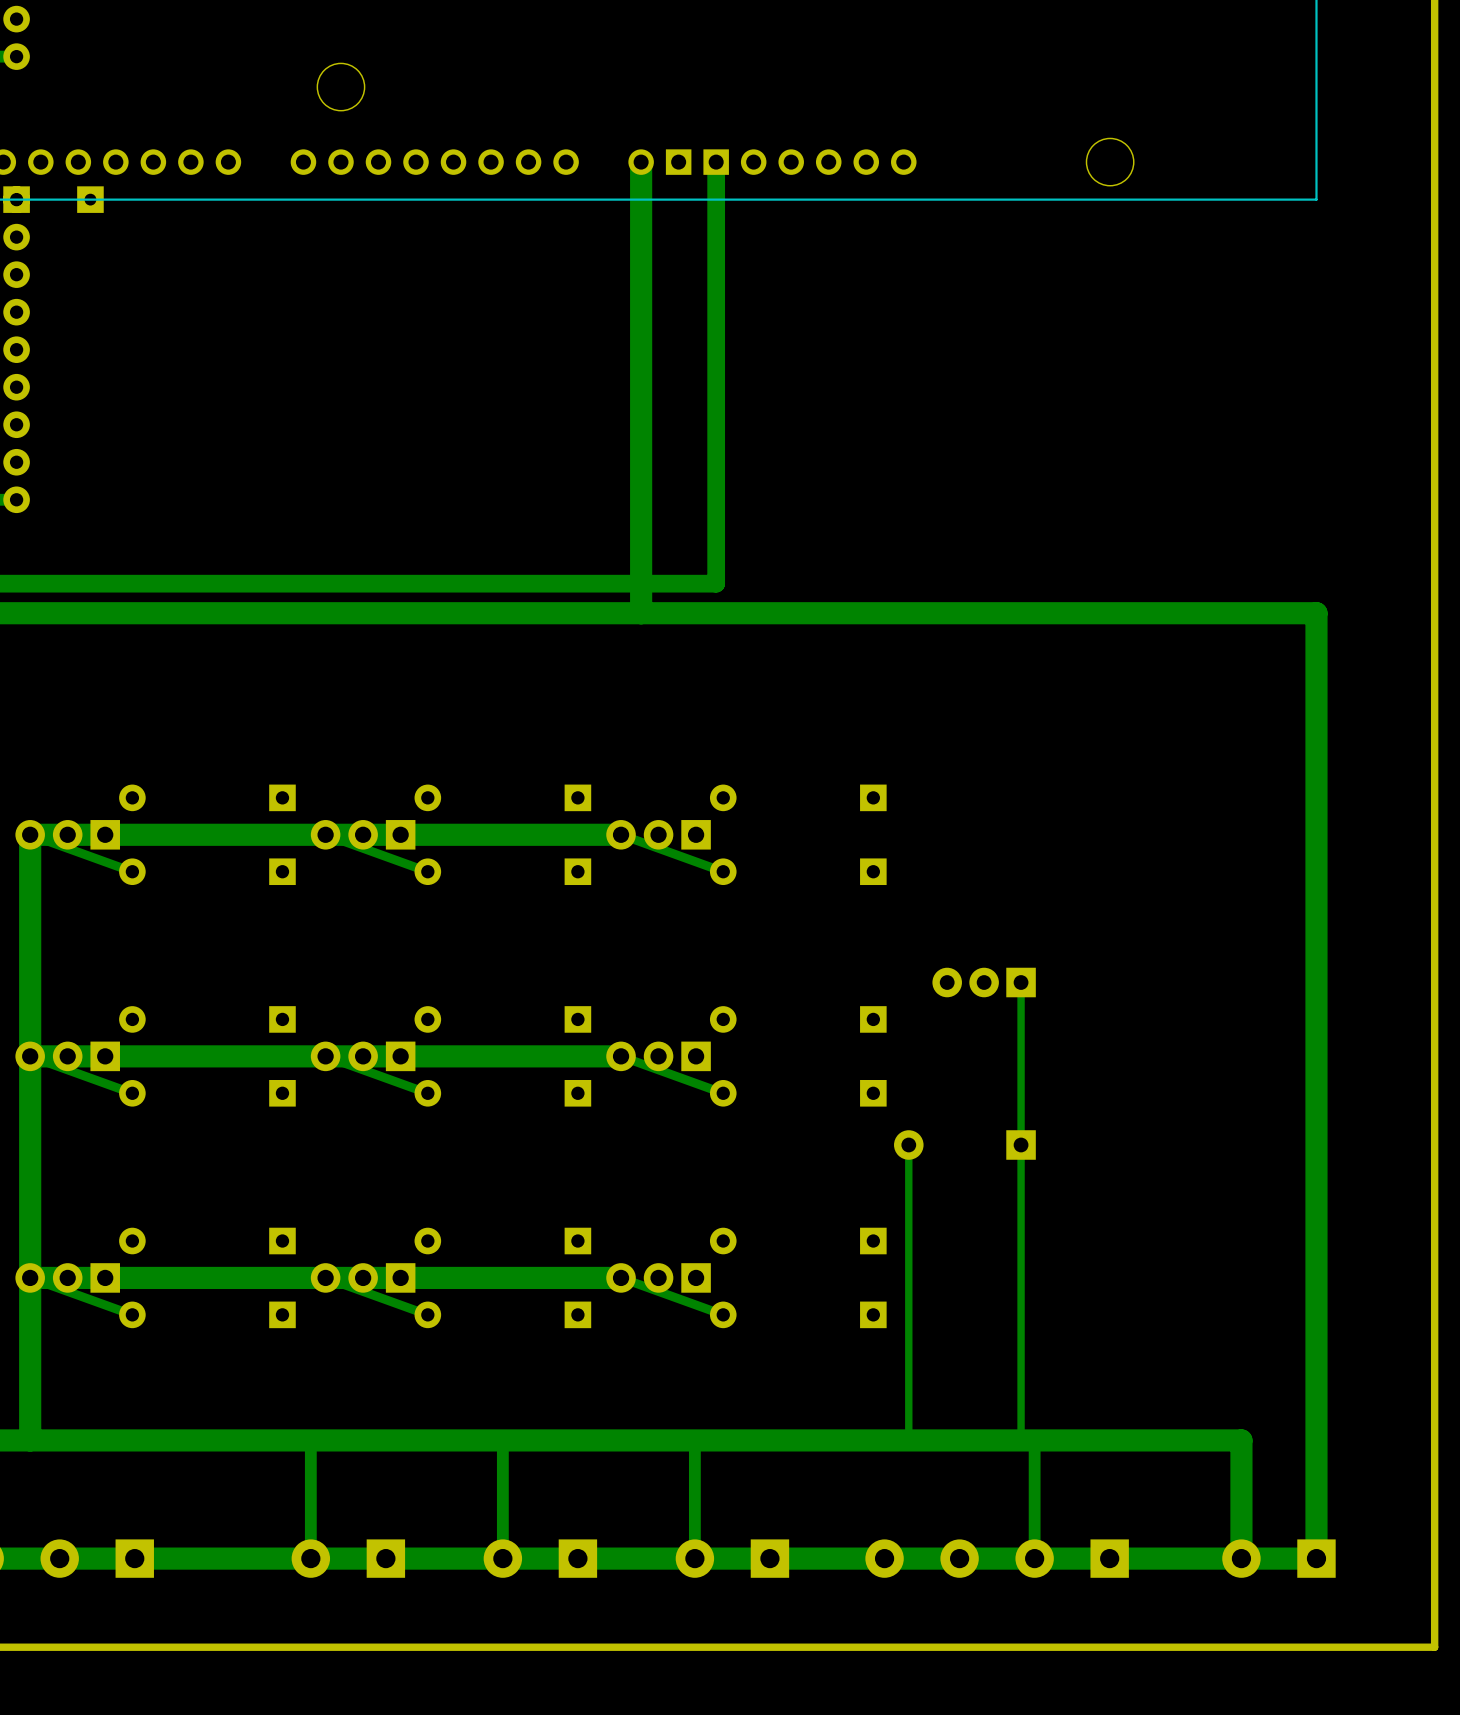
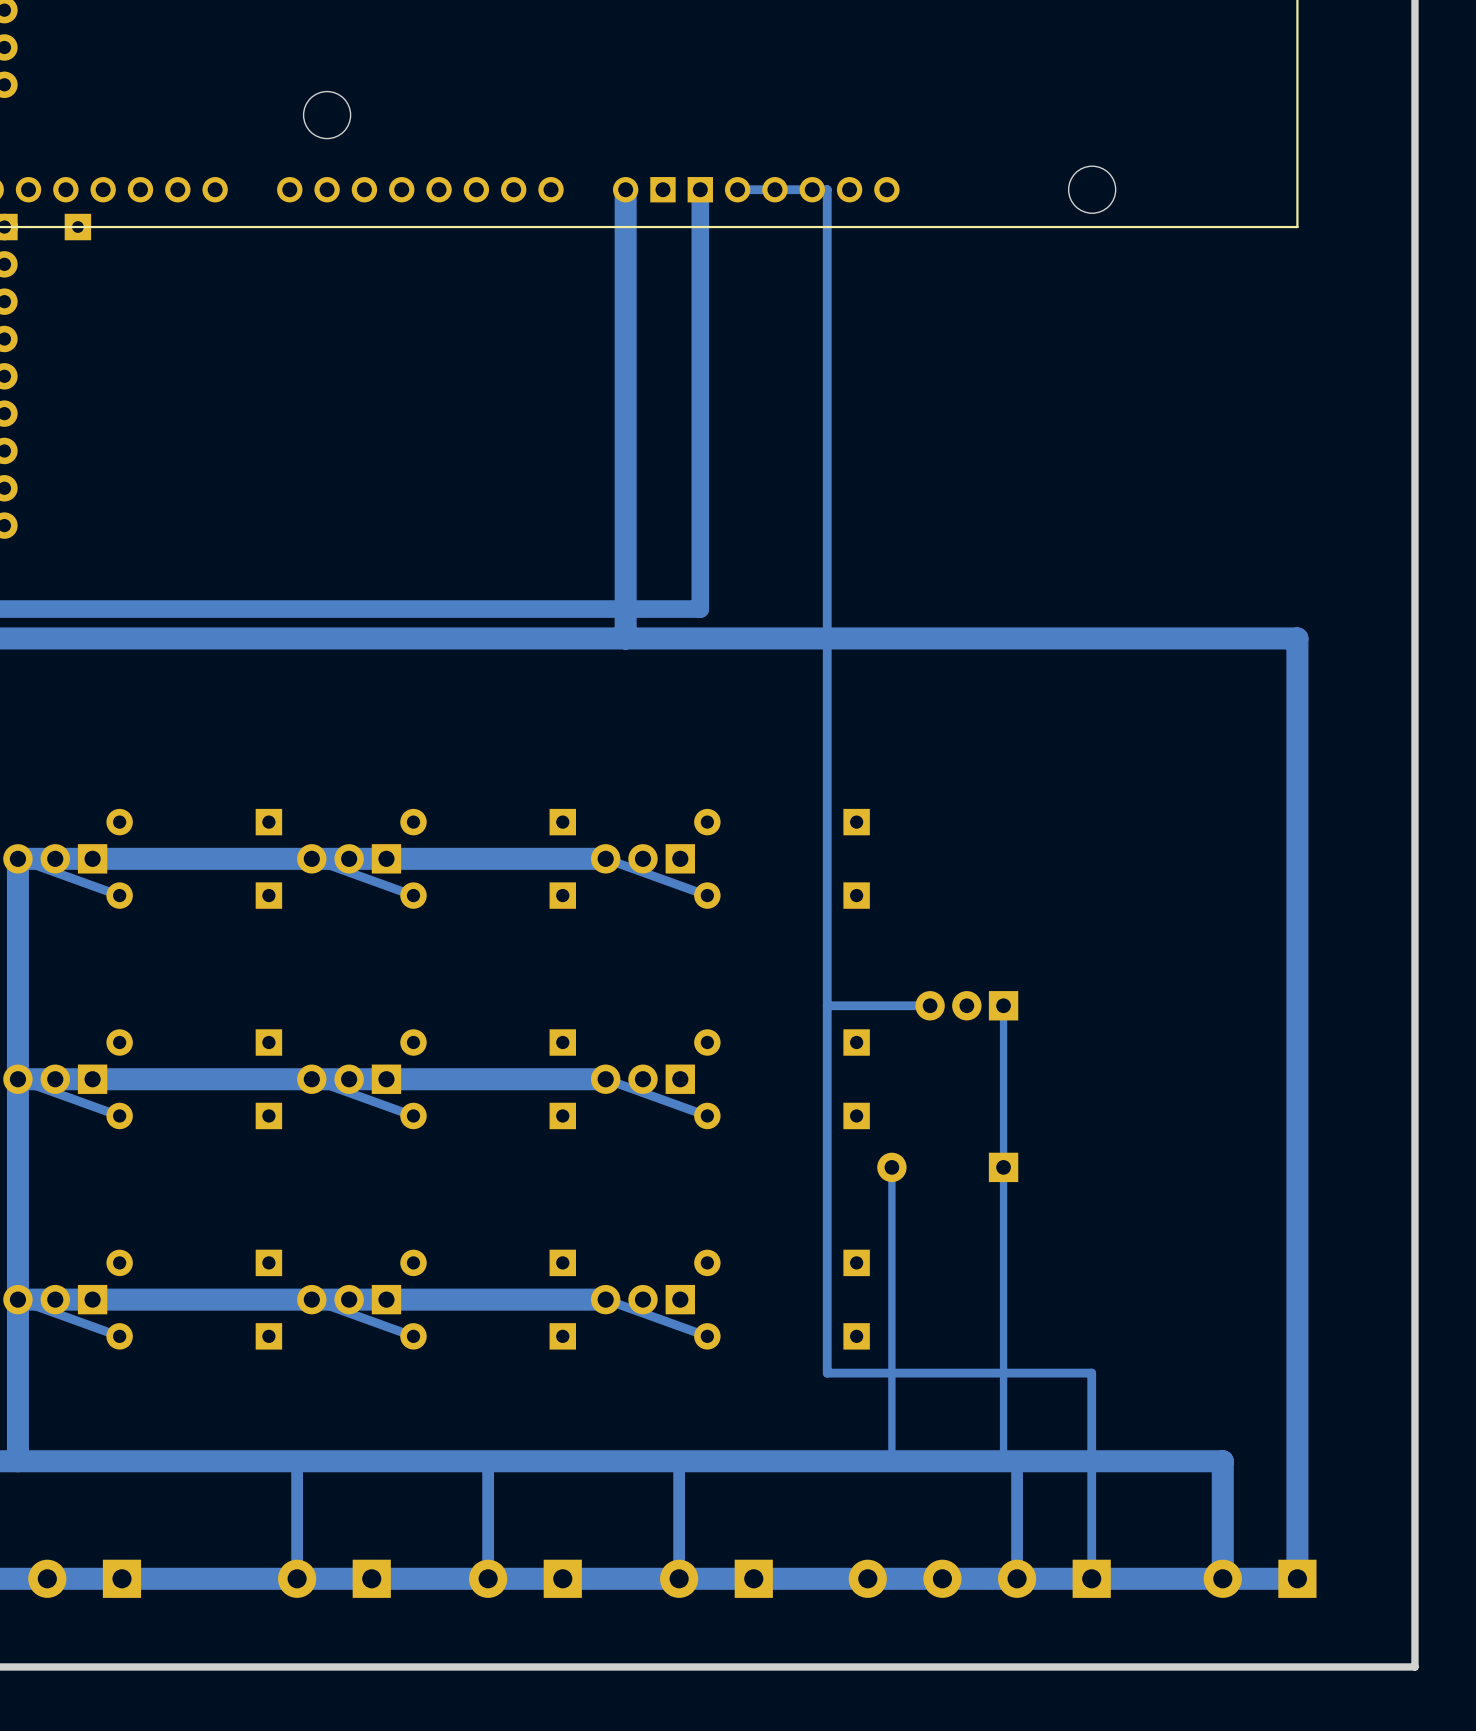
track: none -> (737, 189) (827, 189) (827, 1373) (1091, 1373) (1091, 1578)
track: none -> (930, 1005) (827, 1005)

